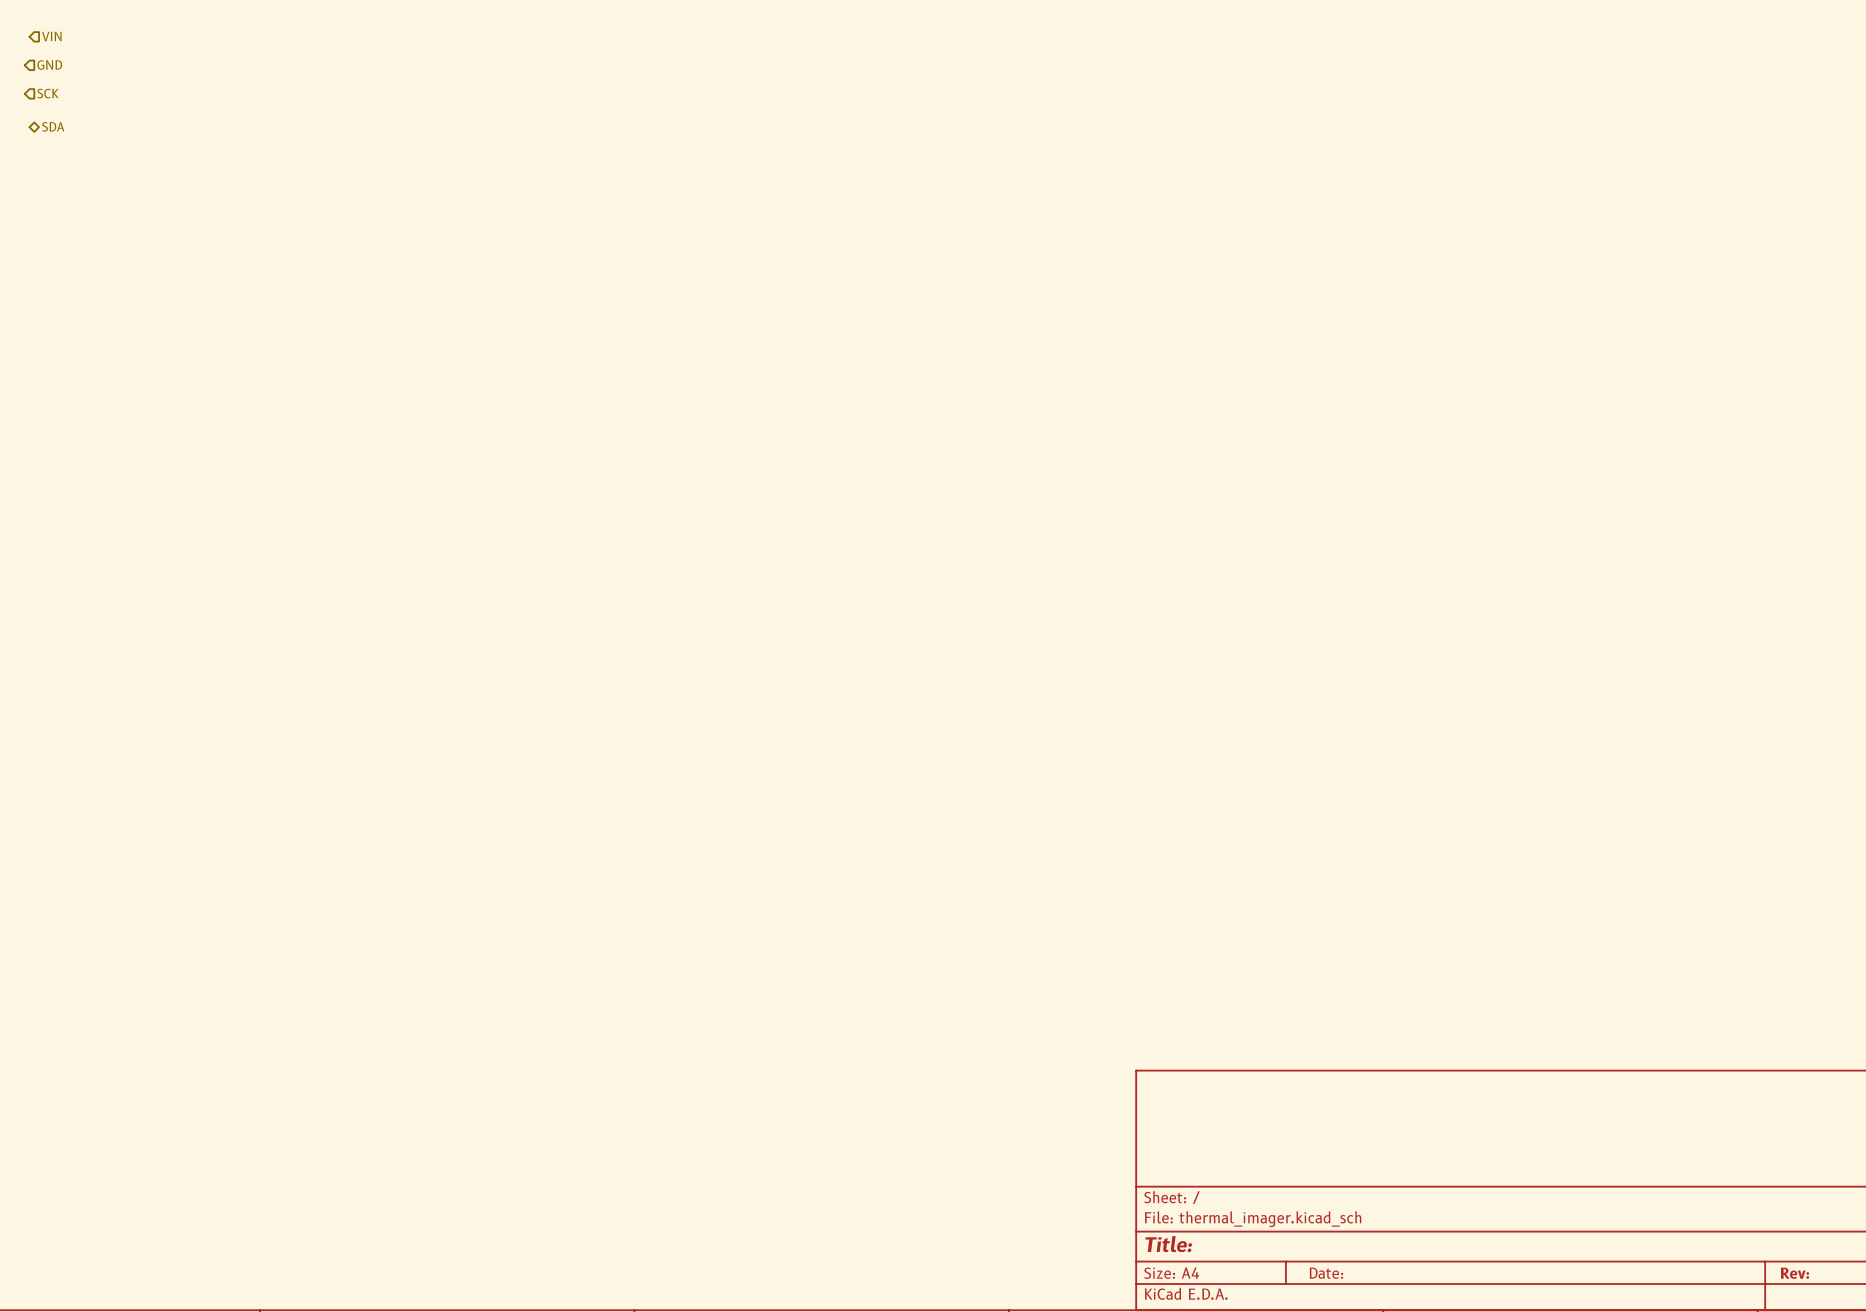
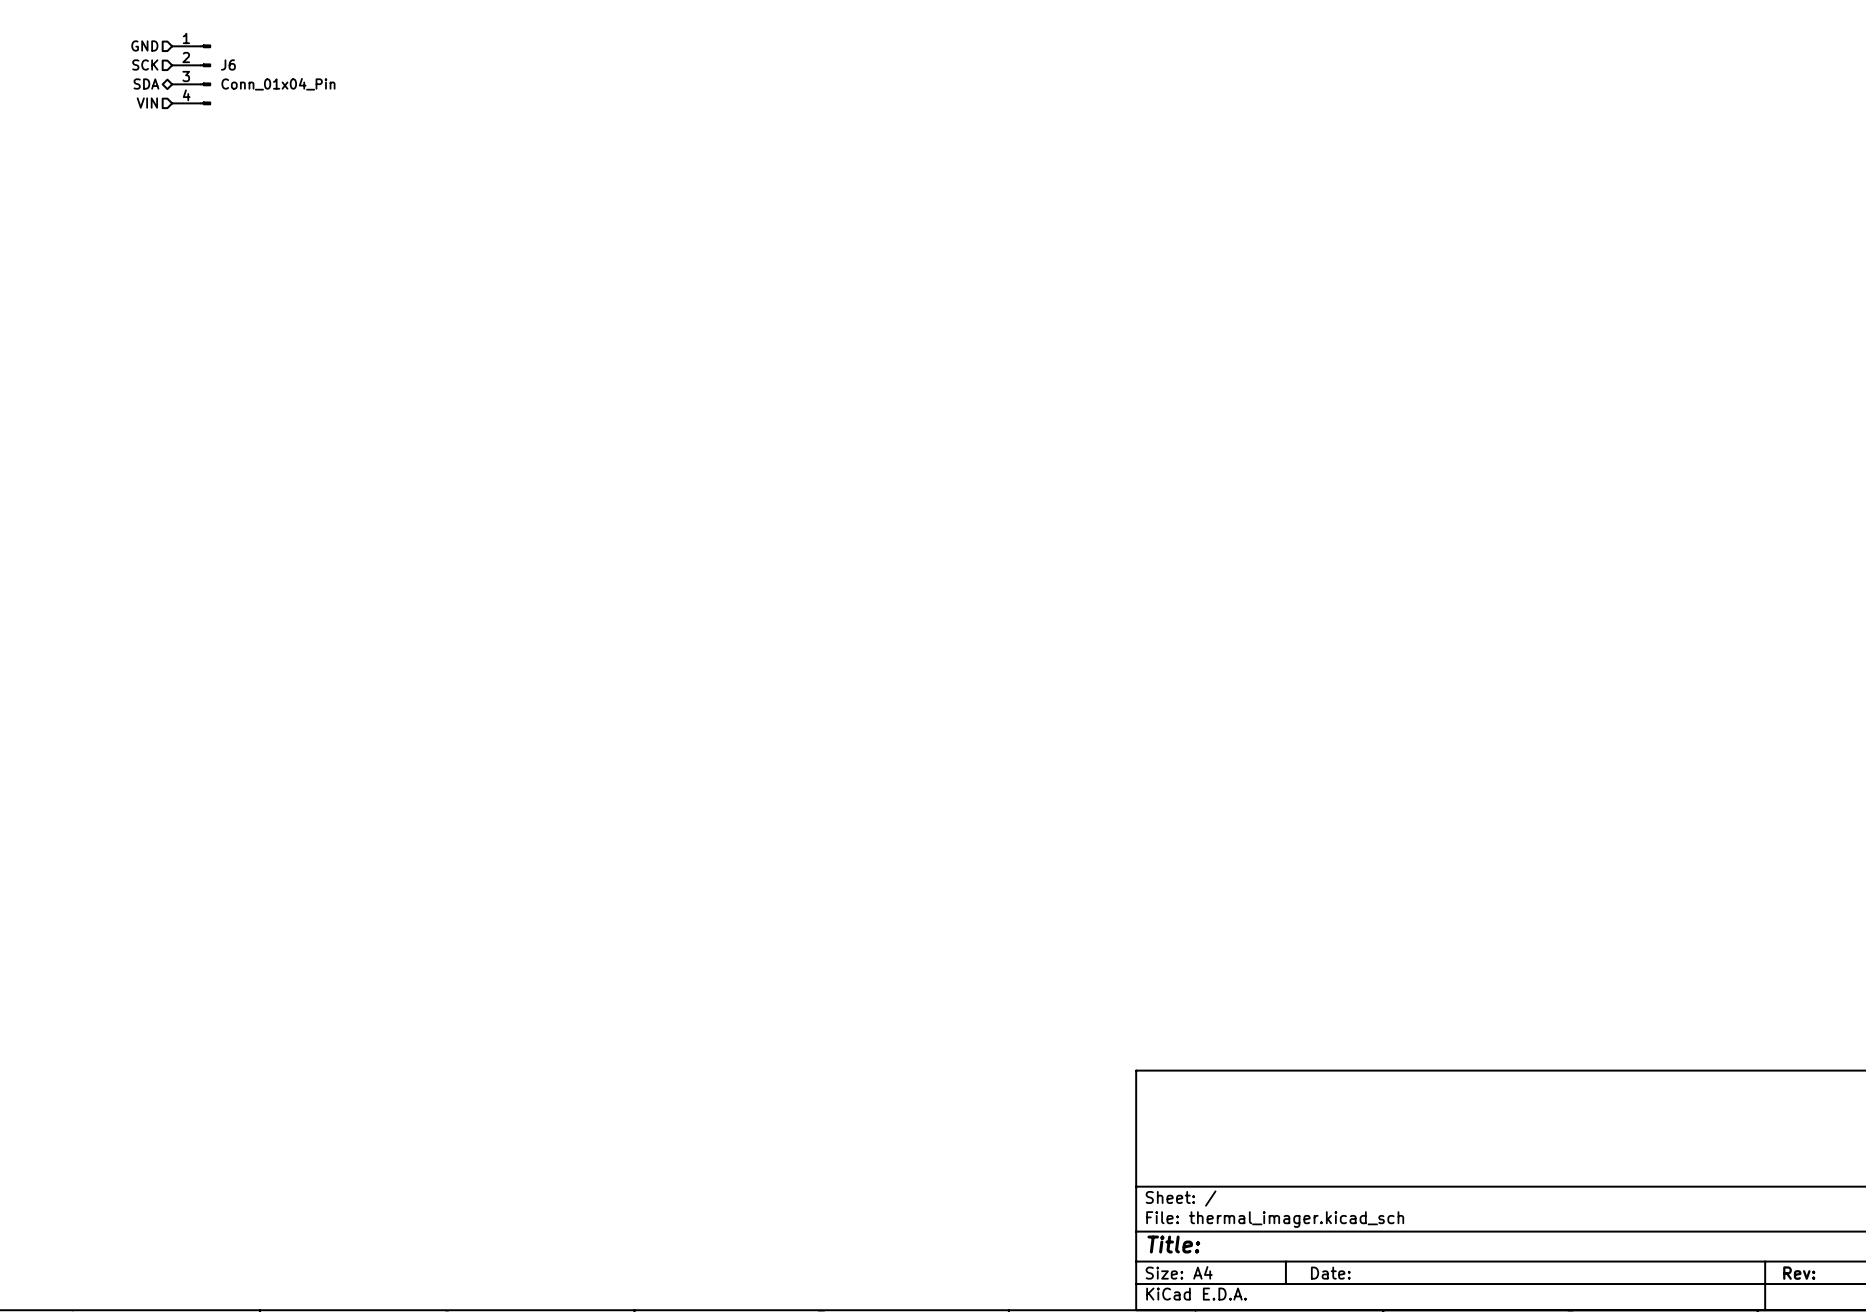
hierarchical label rotation: 0° (51, 36) -> 180° (147, 103)
hierarchical label position: VIN (51, 36) -> VIN (147, 103)
hierarchical label rotation: 0° (49, 65) -> 180° (144, 45)
hierarchical label position: GND (49, 65) -> GND (144, 45)
J6: none -> Conn_01x04_Pin (191, 74)
hierarchical label rotation: 0° (48, 93) -> 180° (145, 64)
hierarchical label position: SCK (48, 93) -> SCK (145, 64)
hierarchical label rotation: 0° (53, 126) -> 180° (146, 84)
hierarchical label position: SDA (53, 126) -> SDA (146, 84)

